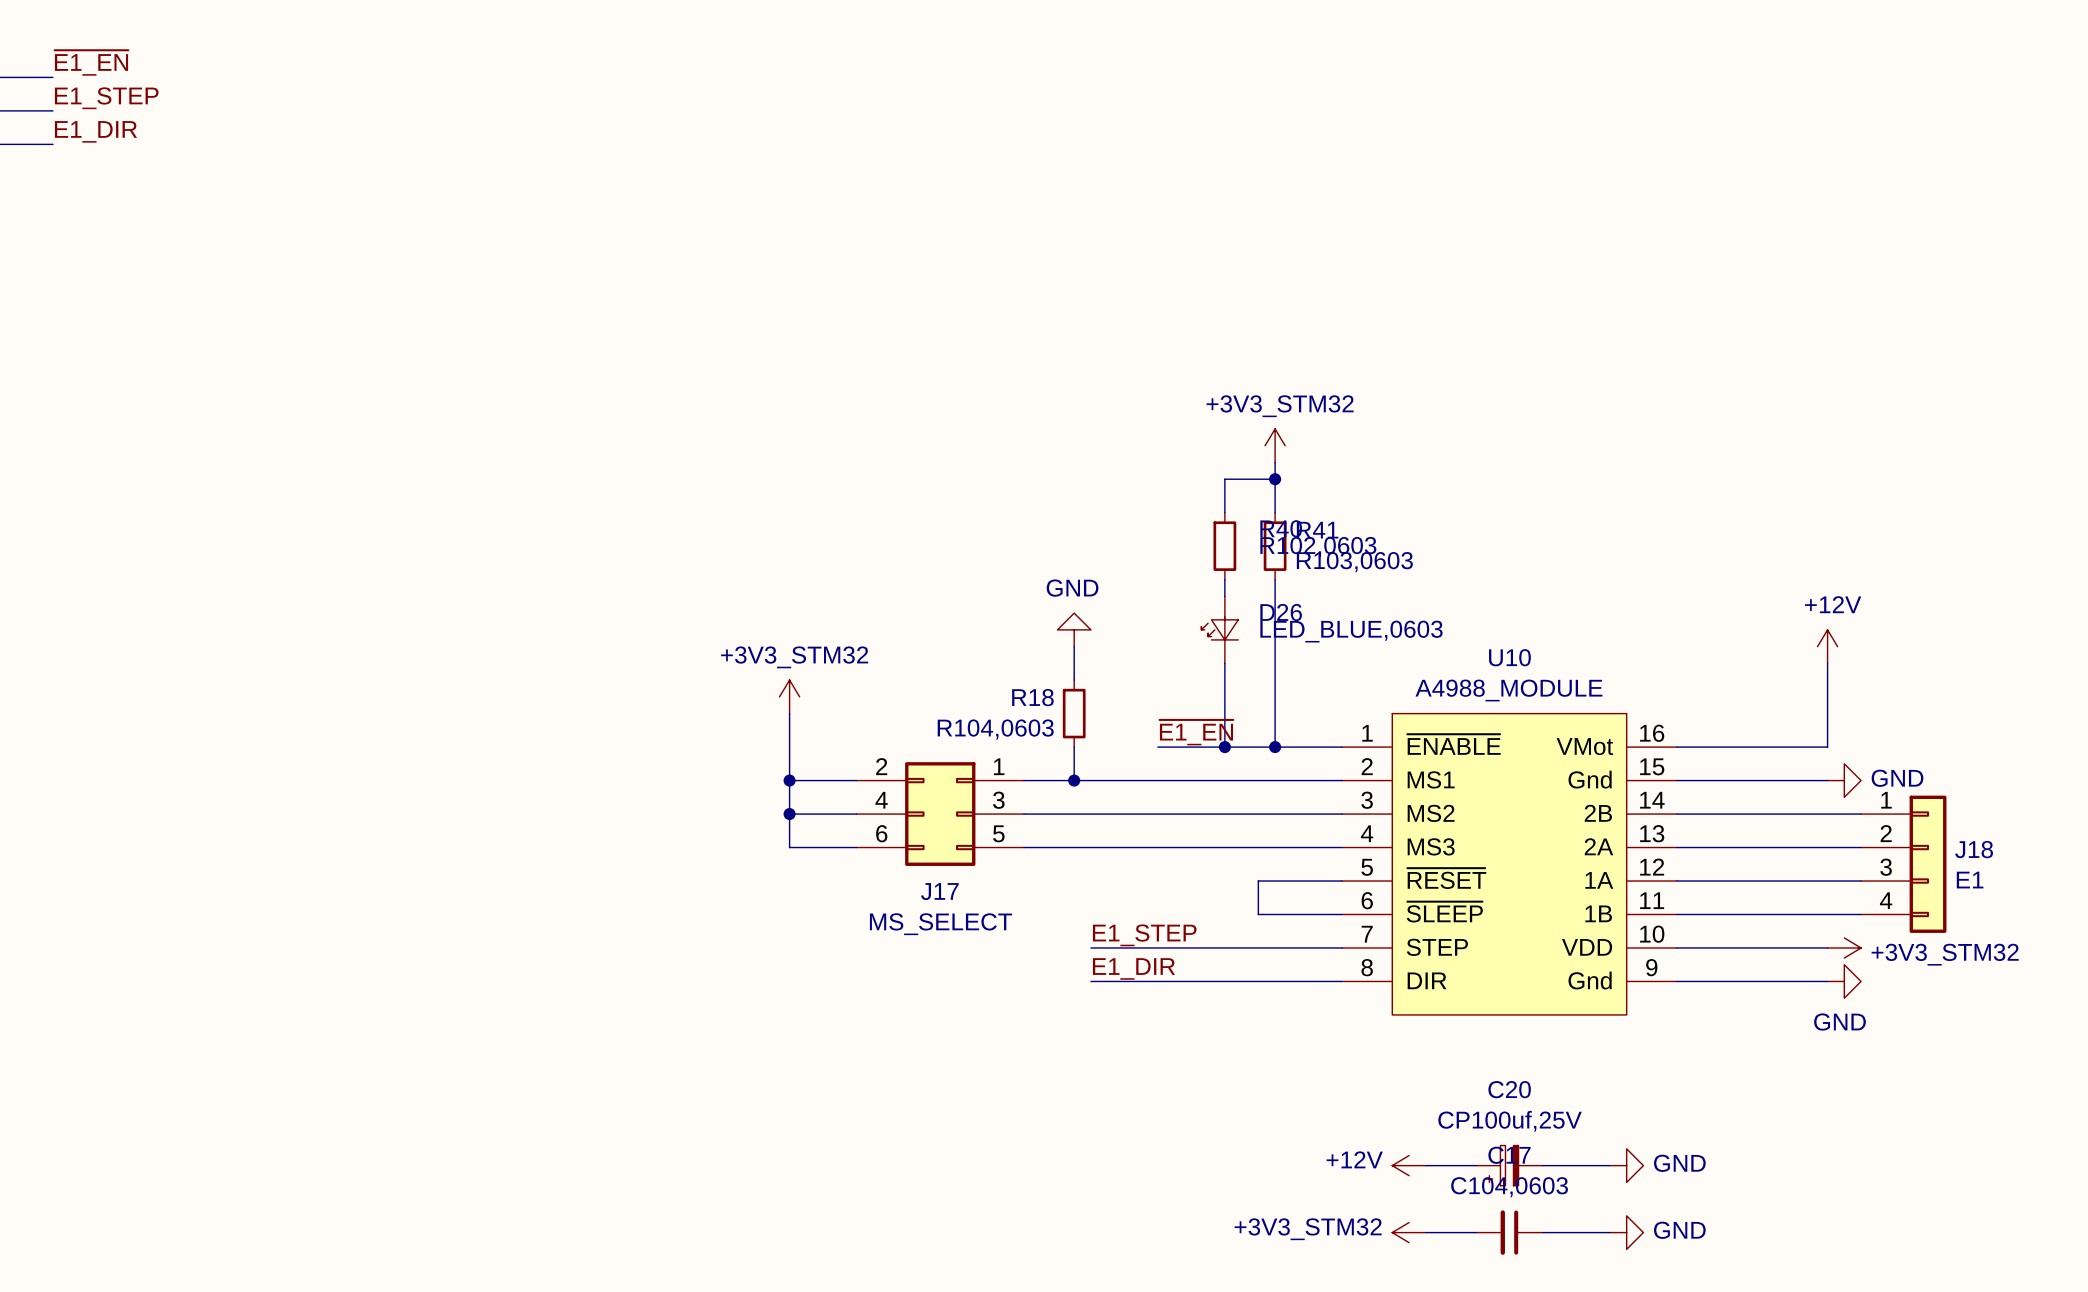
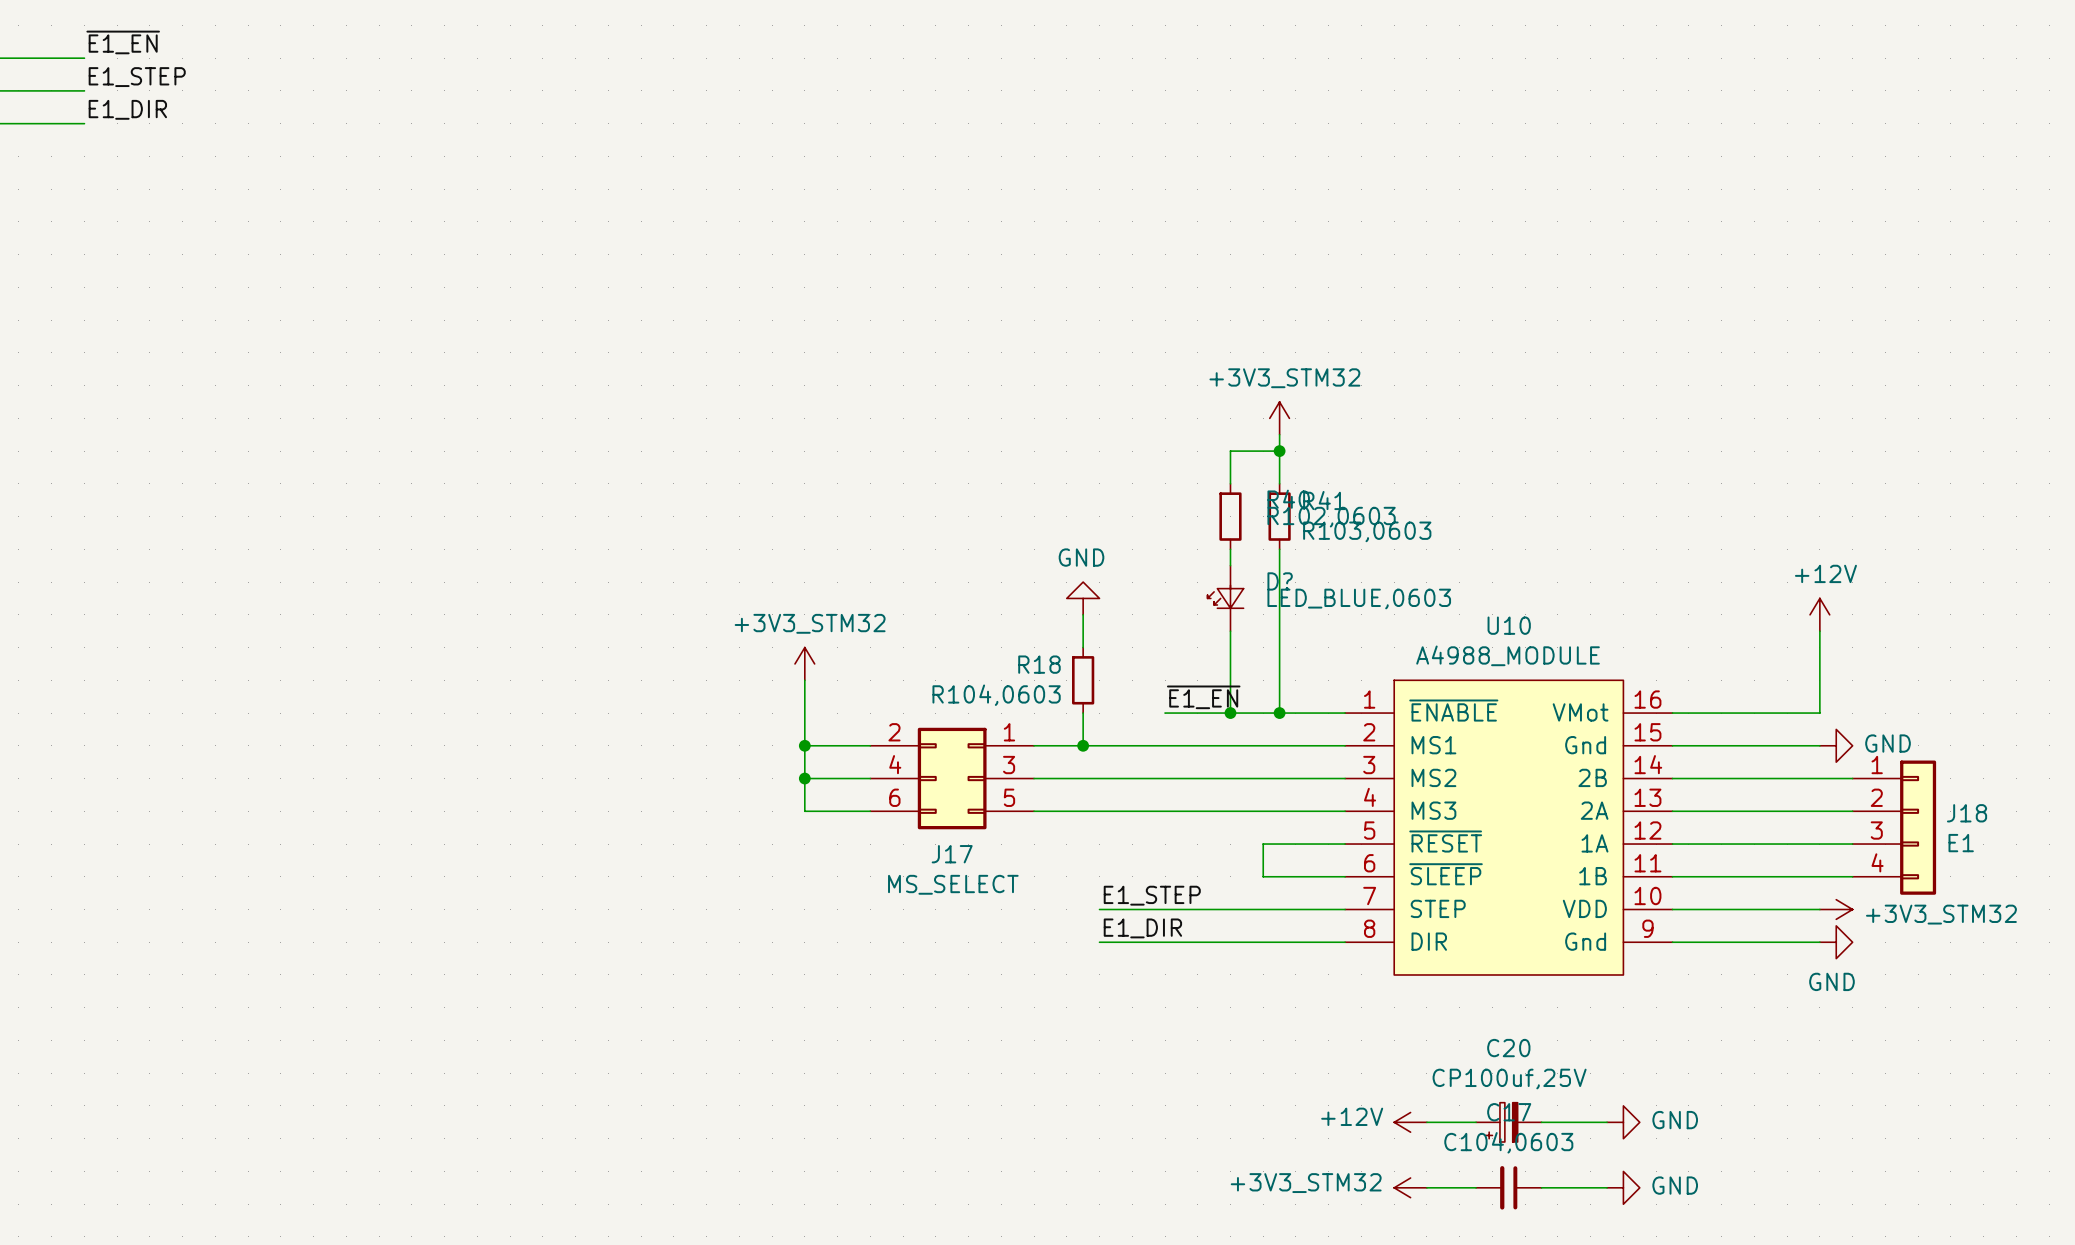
D26 name: D26 (1281, 612) -> D? (1280, 581)

